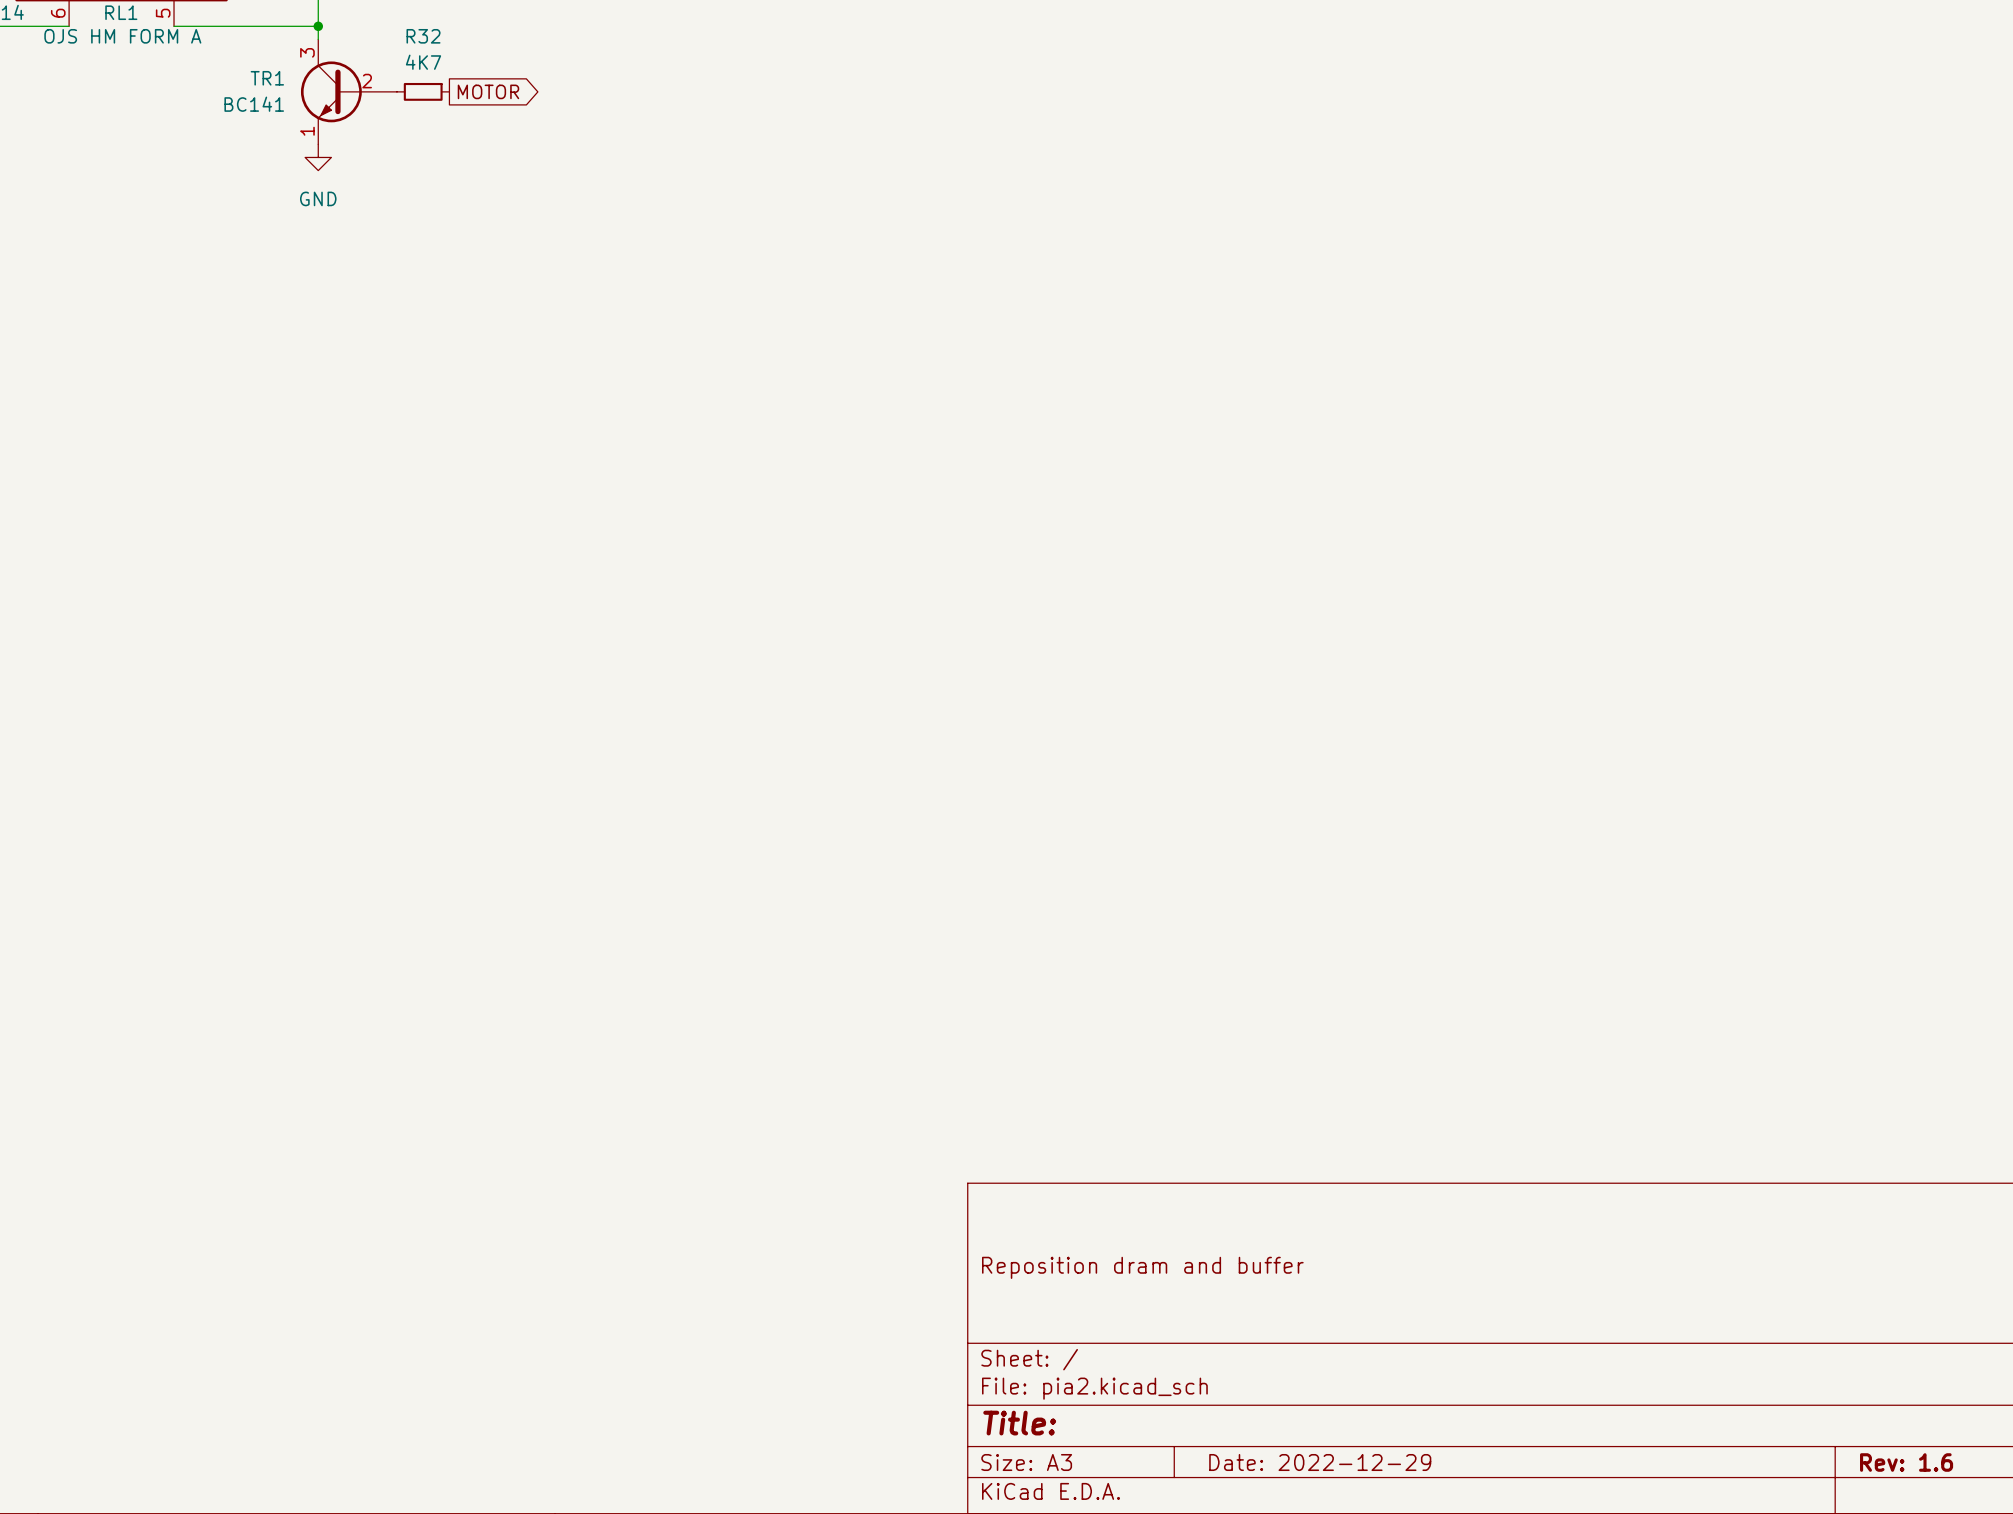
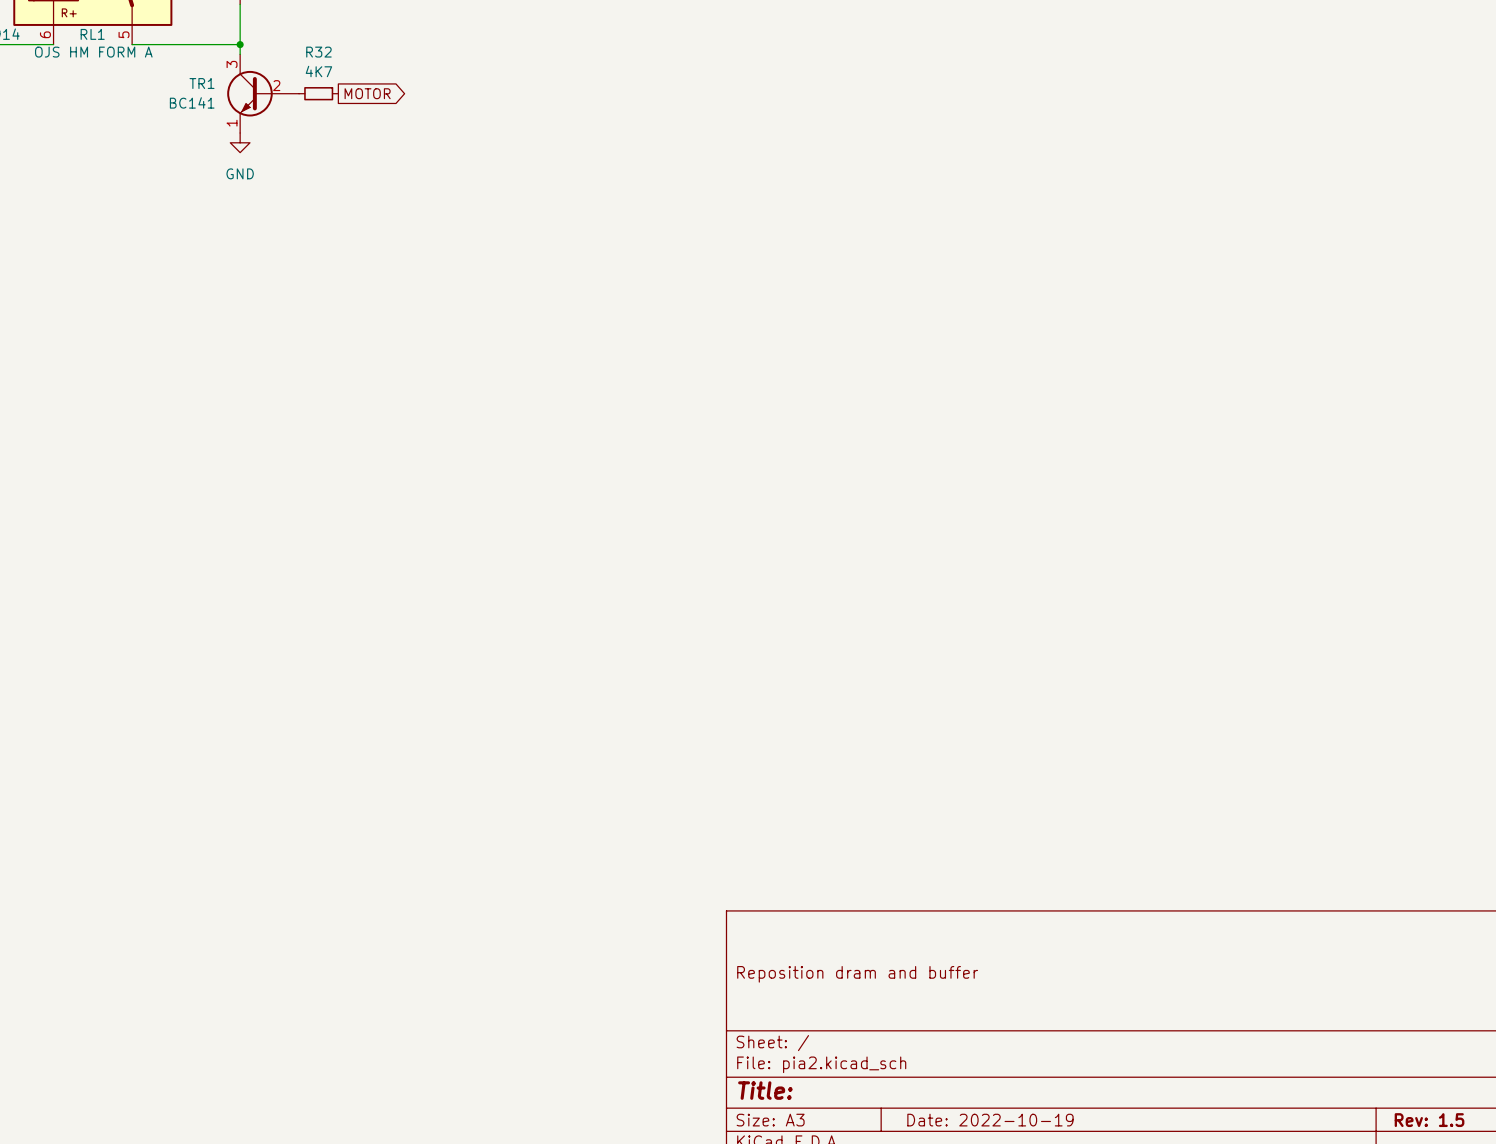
title block: Date: 2022-12-29 (1320, 1462) -> Date: 2022-10-19 (990, 1120)
title block: Rev: 1.6 (1906, 1462) -> Rev: 1.5 (1429, 1120)

